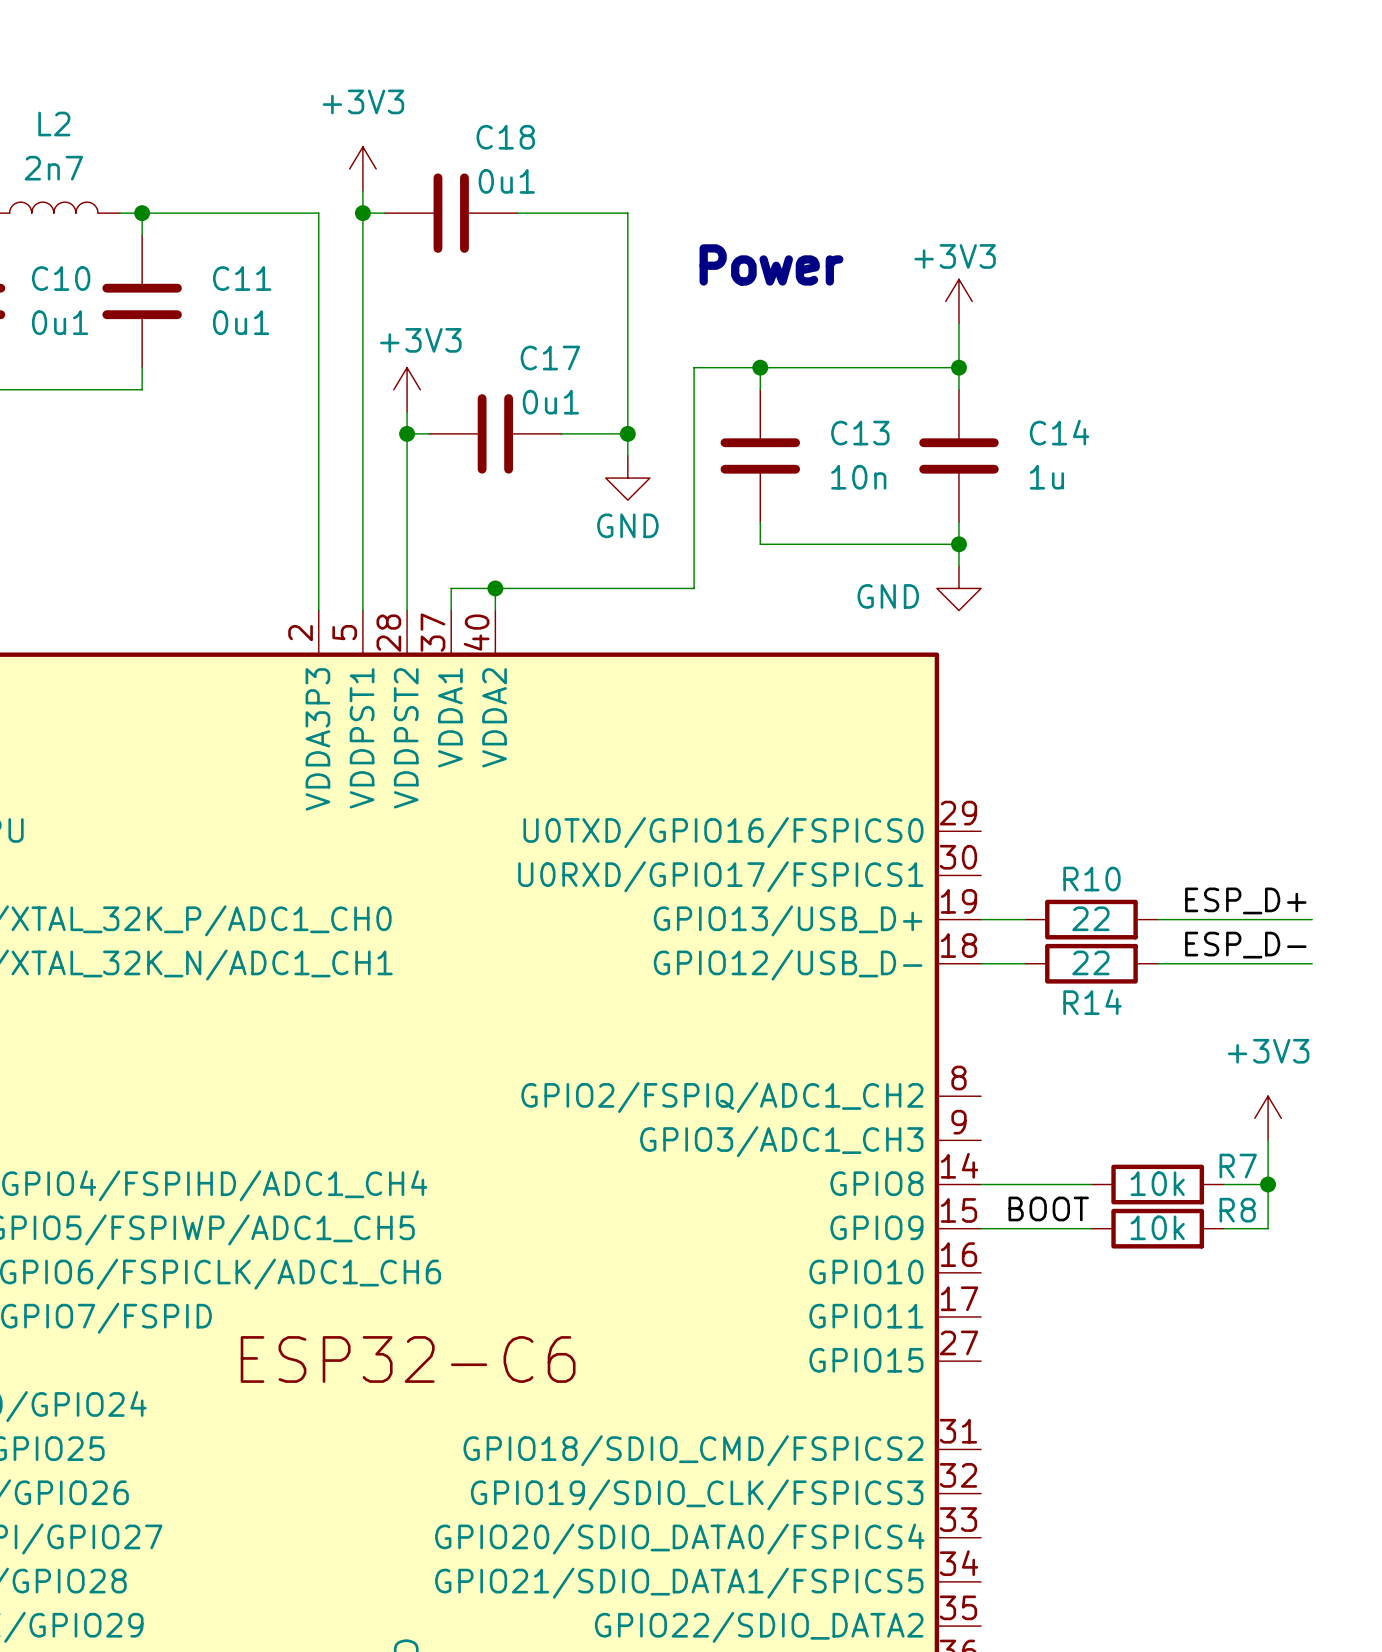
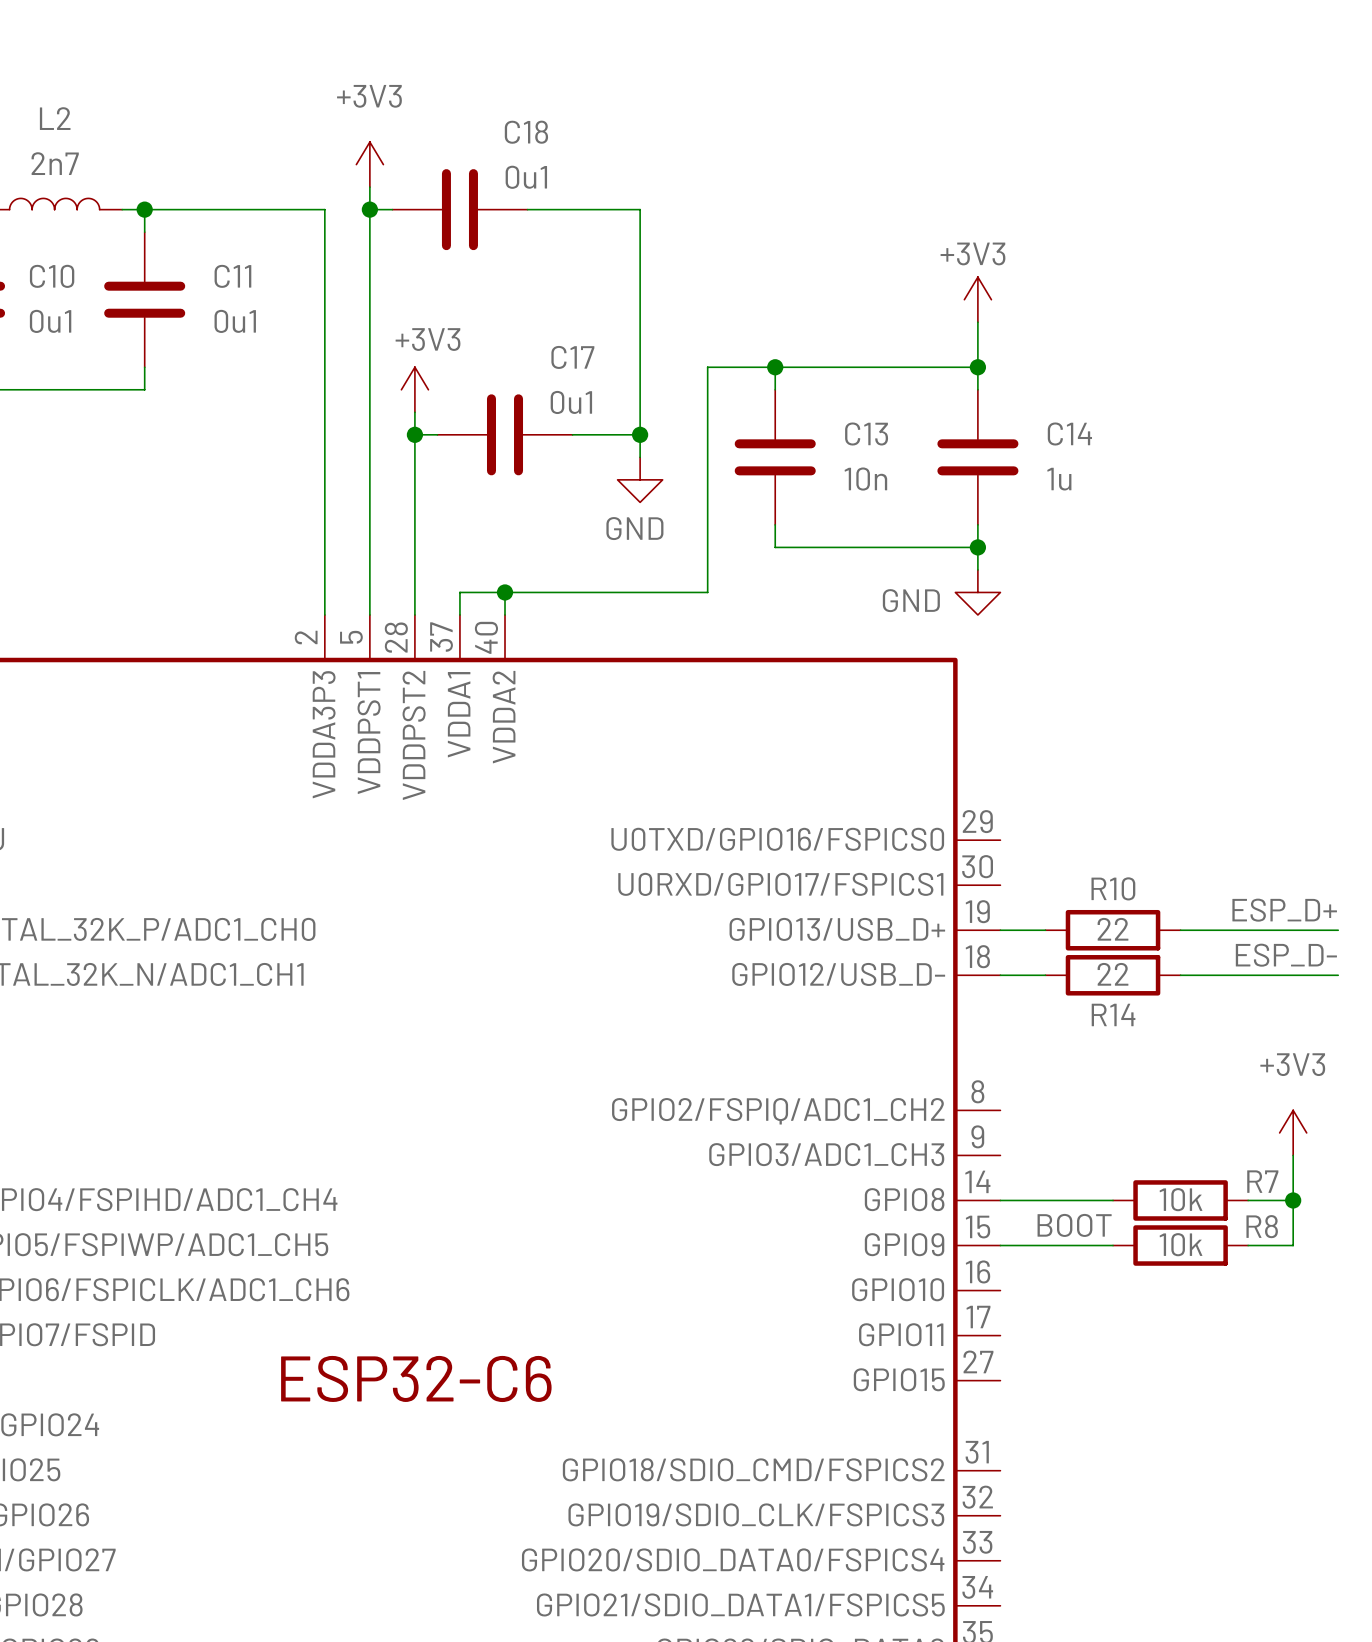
text: Power (771, 264) -> none

